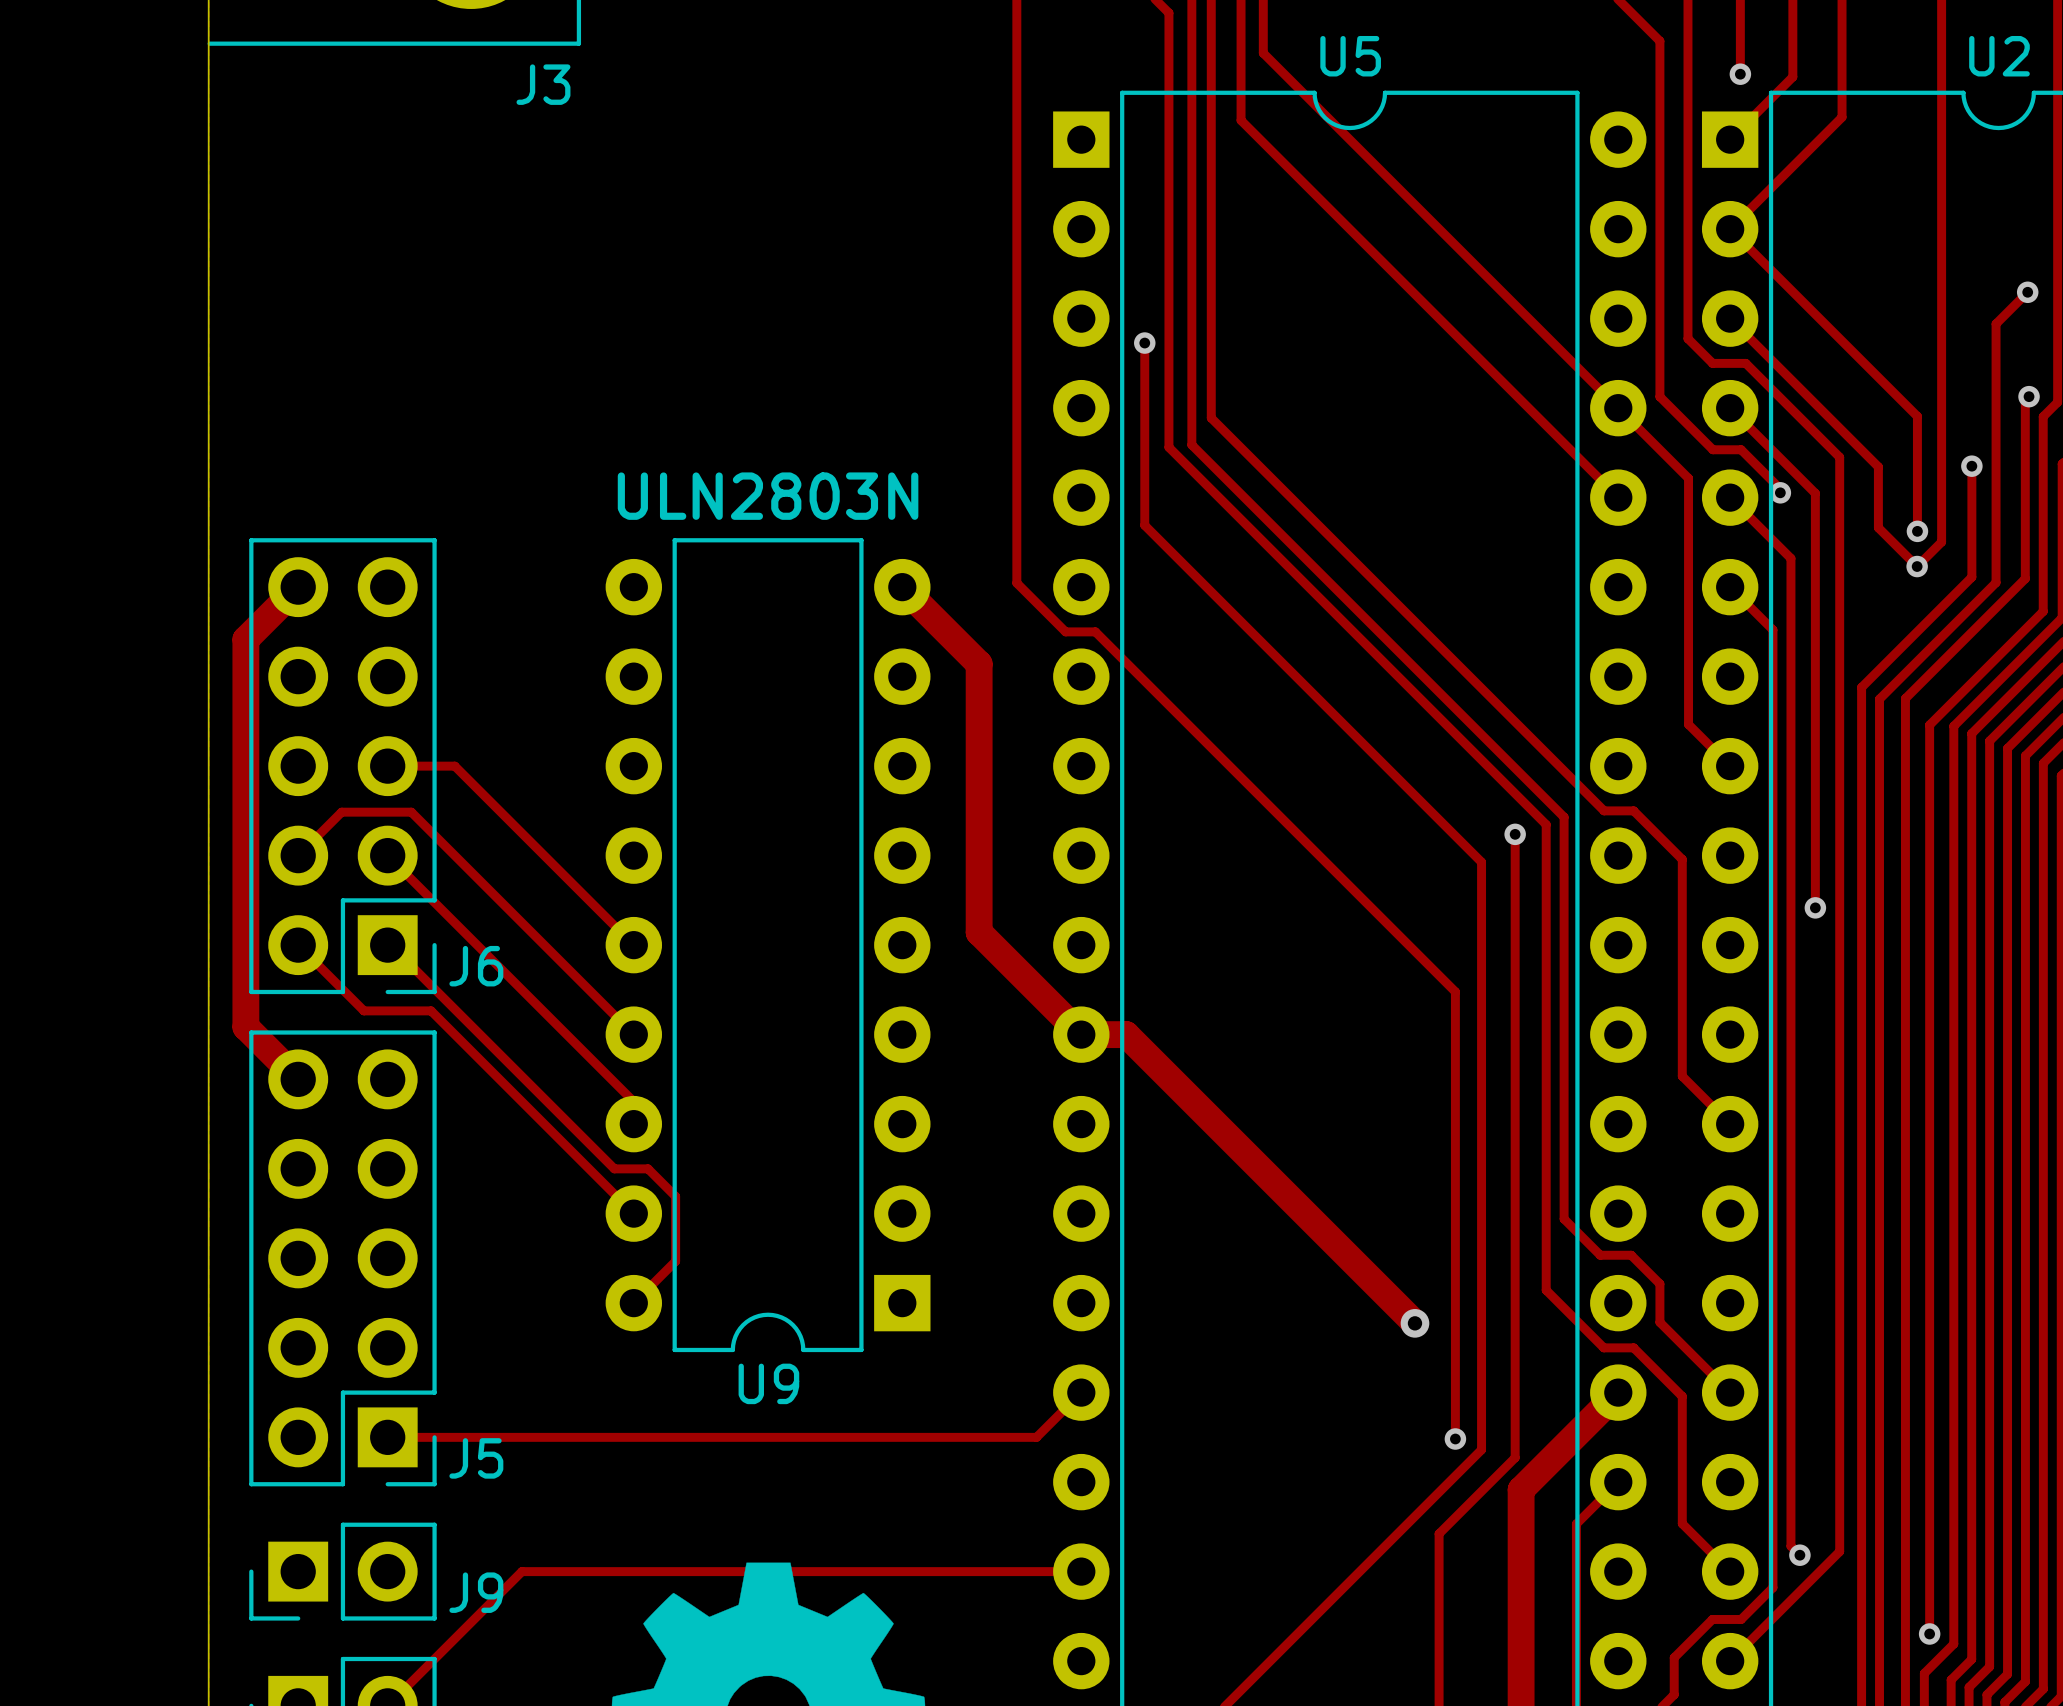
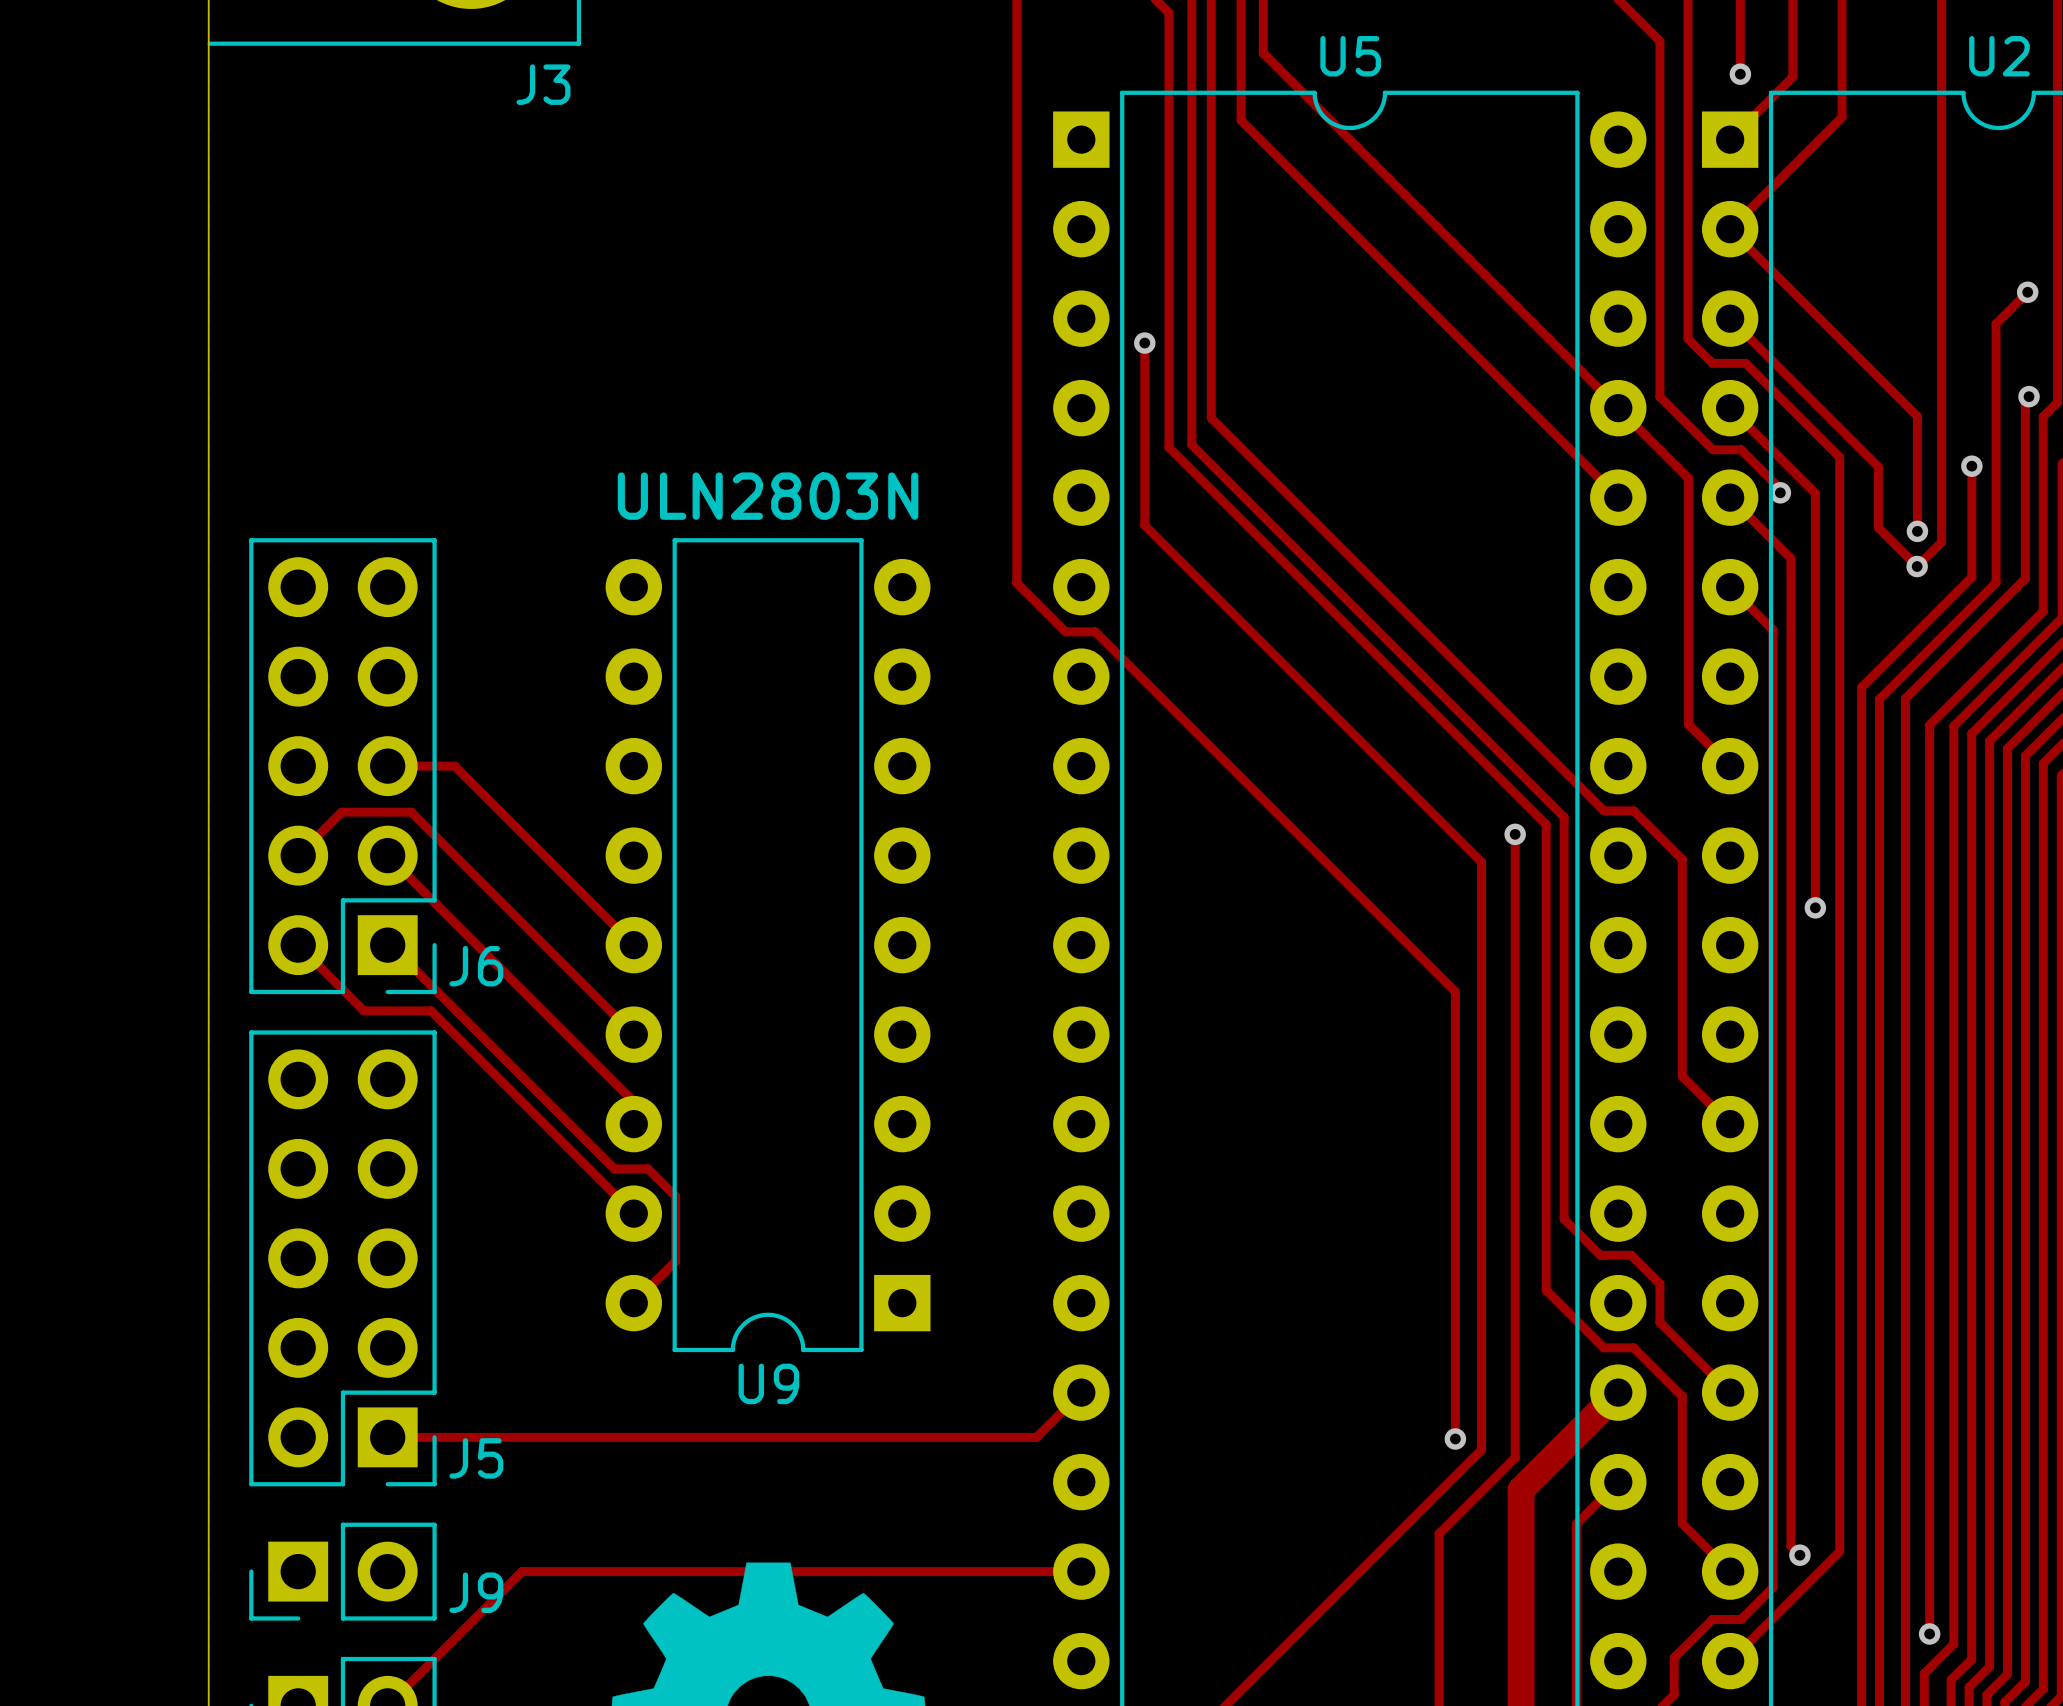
track: (298, 587) (245, 639) (245, 1027) (298, 1079) -> none
track: (902, 587) (979, 663) (979, 932) (1081, 1034) (1126, 1034) (1414, 1323) -> none
via: (1414, 1323) -> none

